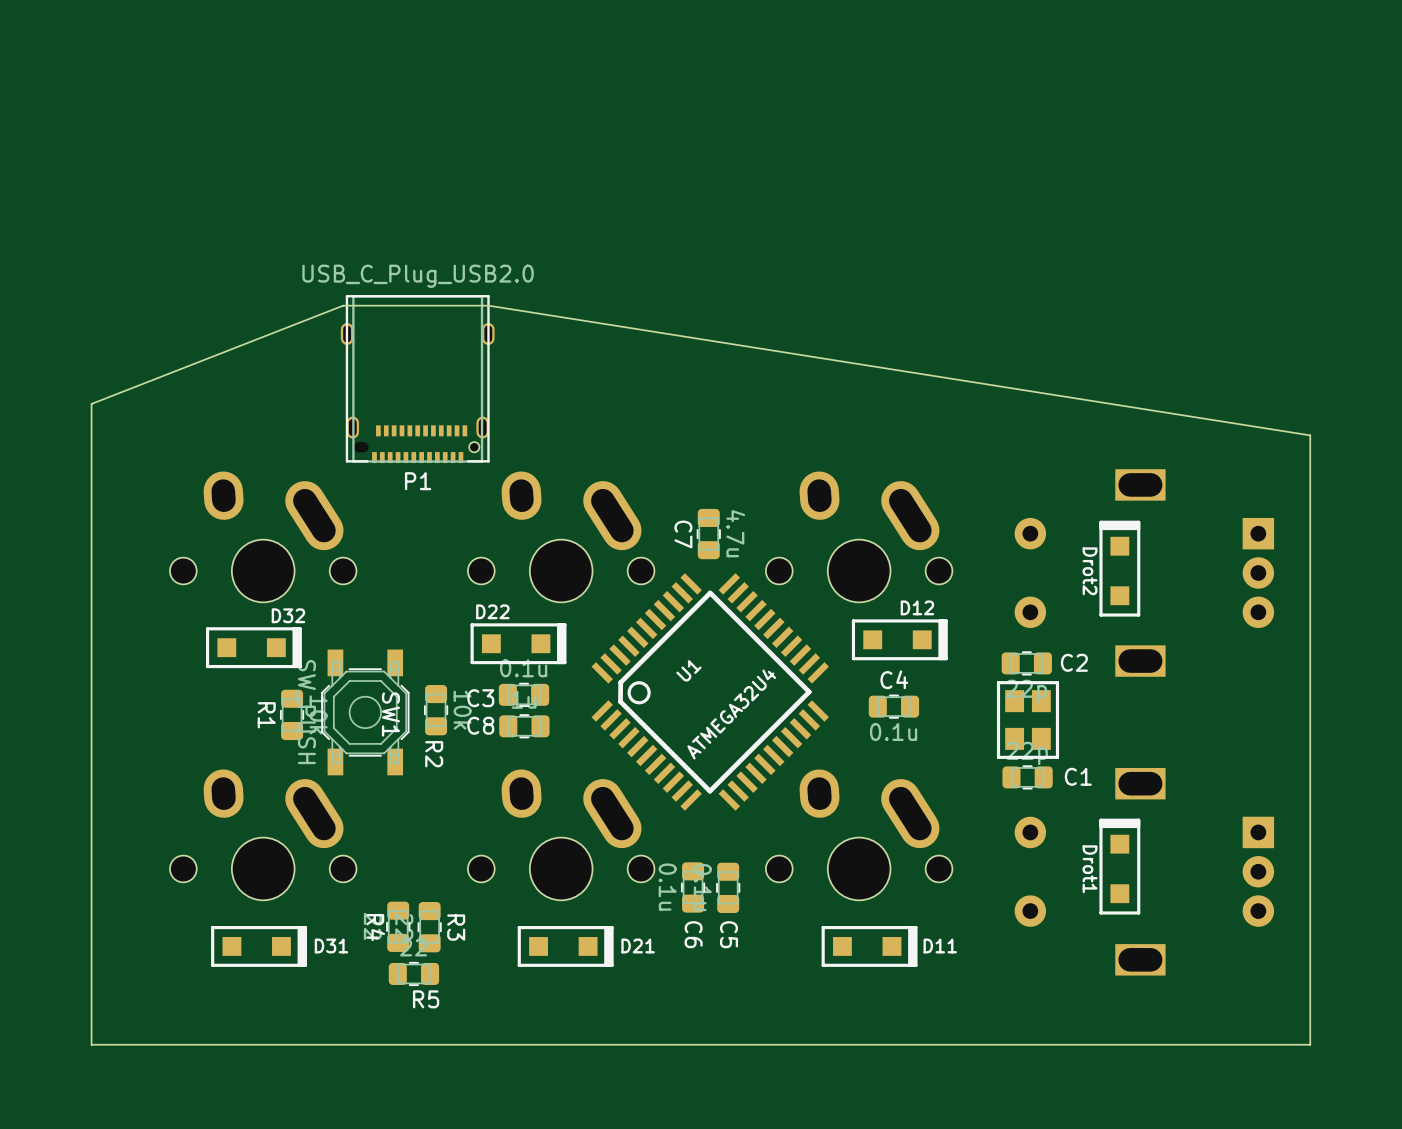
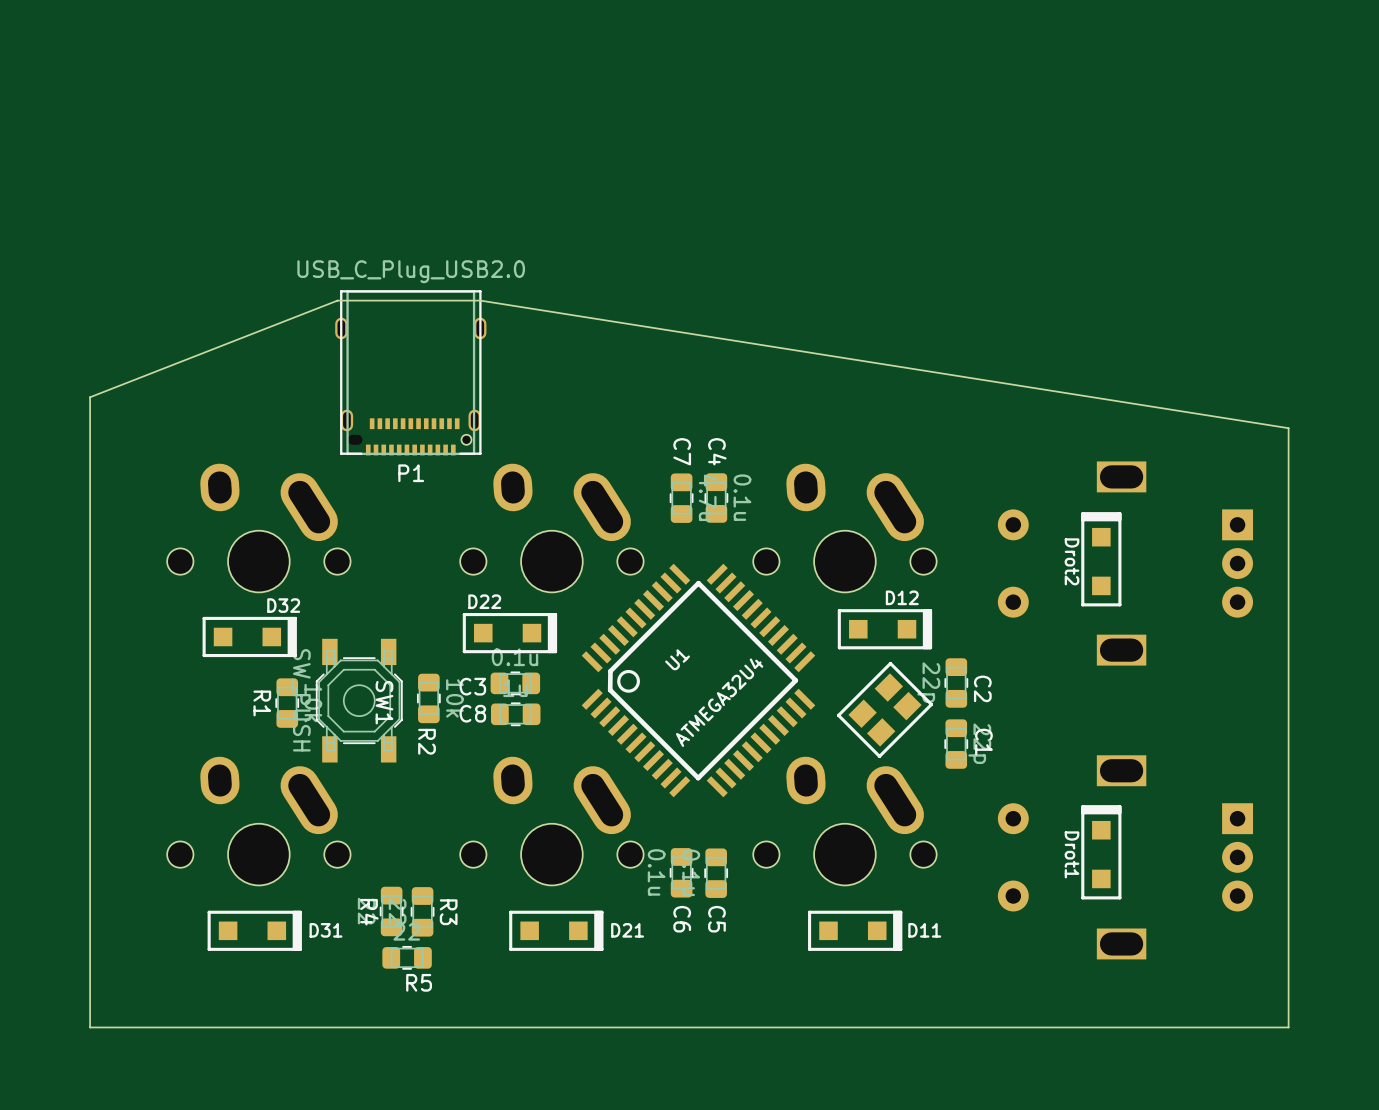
C7 name position: C7 (683, 534) -> C7 (682, 451)
C7 position: (708, 534) -> (681, 498)
C2 rotation: 0° (1026, 663) -> 90° clockwise (956, 682)
C2 position: (1026, 663) -> (956, 682)
C4 rotation: 0° (893, 706) -> 90° clockwise (716, 498)
C4 position: (893, 706) -> (716, 498)
part: (1027, 720) -> none
part: none -> (885, 709)
C4 value position: 0.1u (893, 732) -> 0.1u (742, 497)
C1 rotation: 0° (1027, 777) -> 90° clockwise (956, 744)
C1 position: (1027, 777) -> (956, 744)

